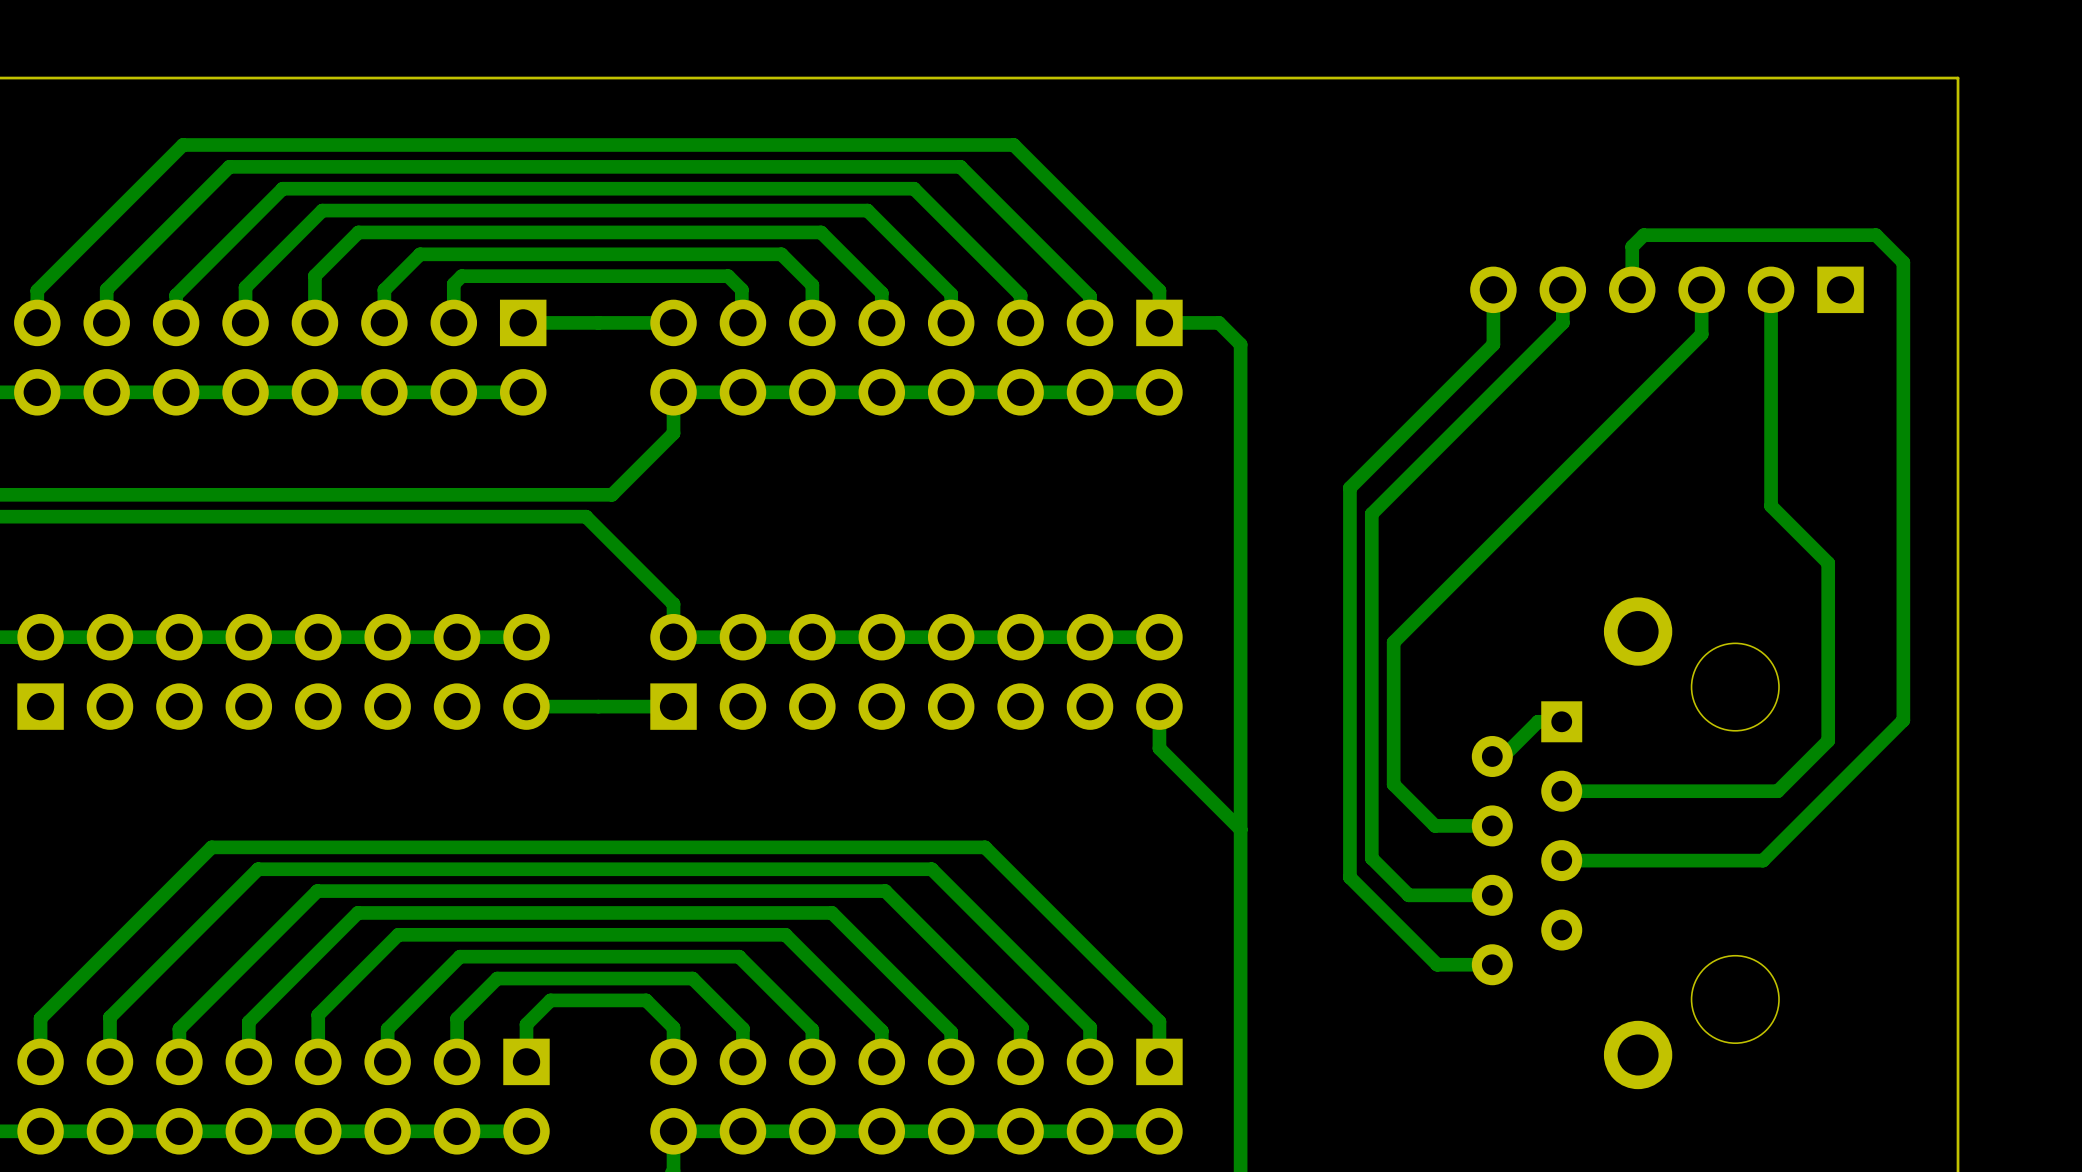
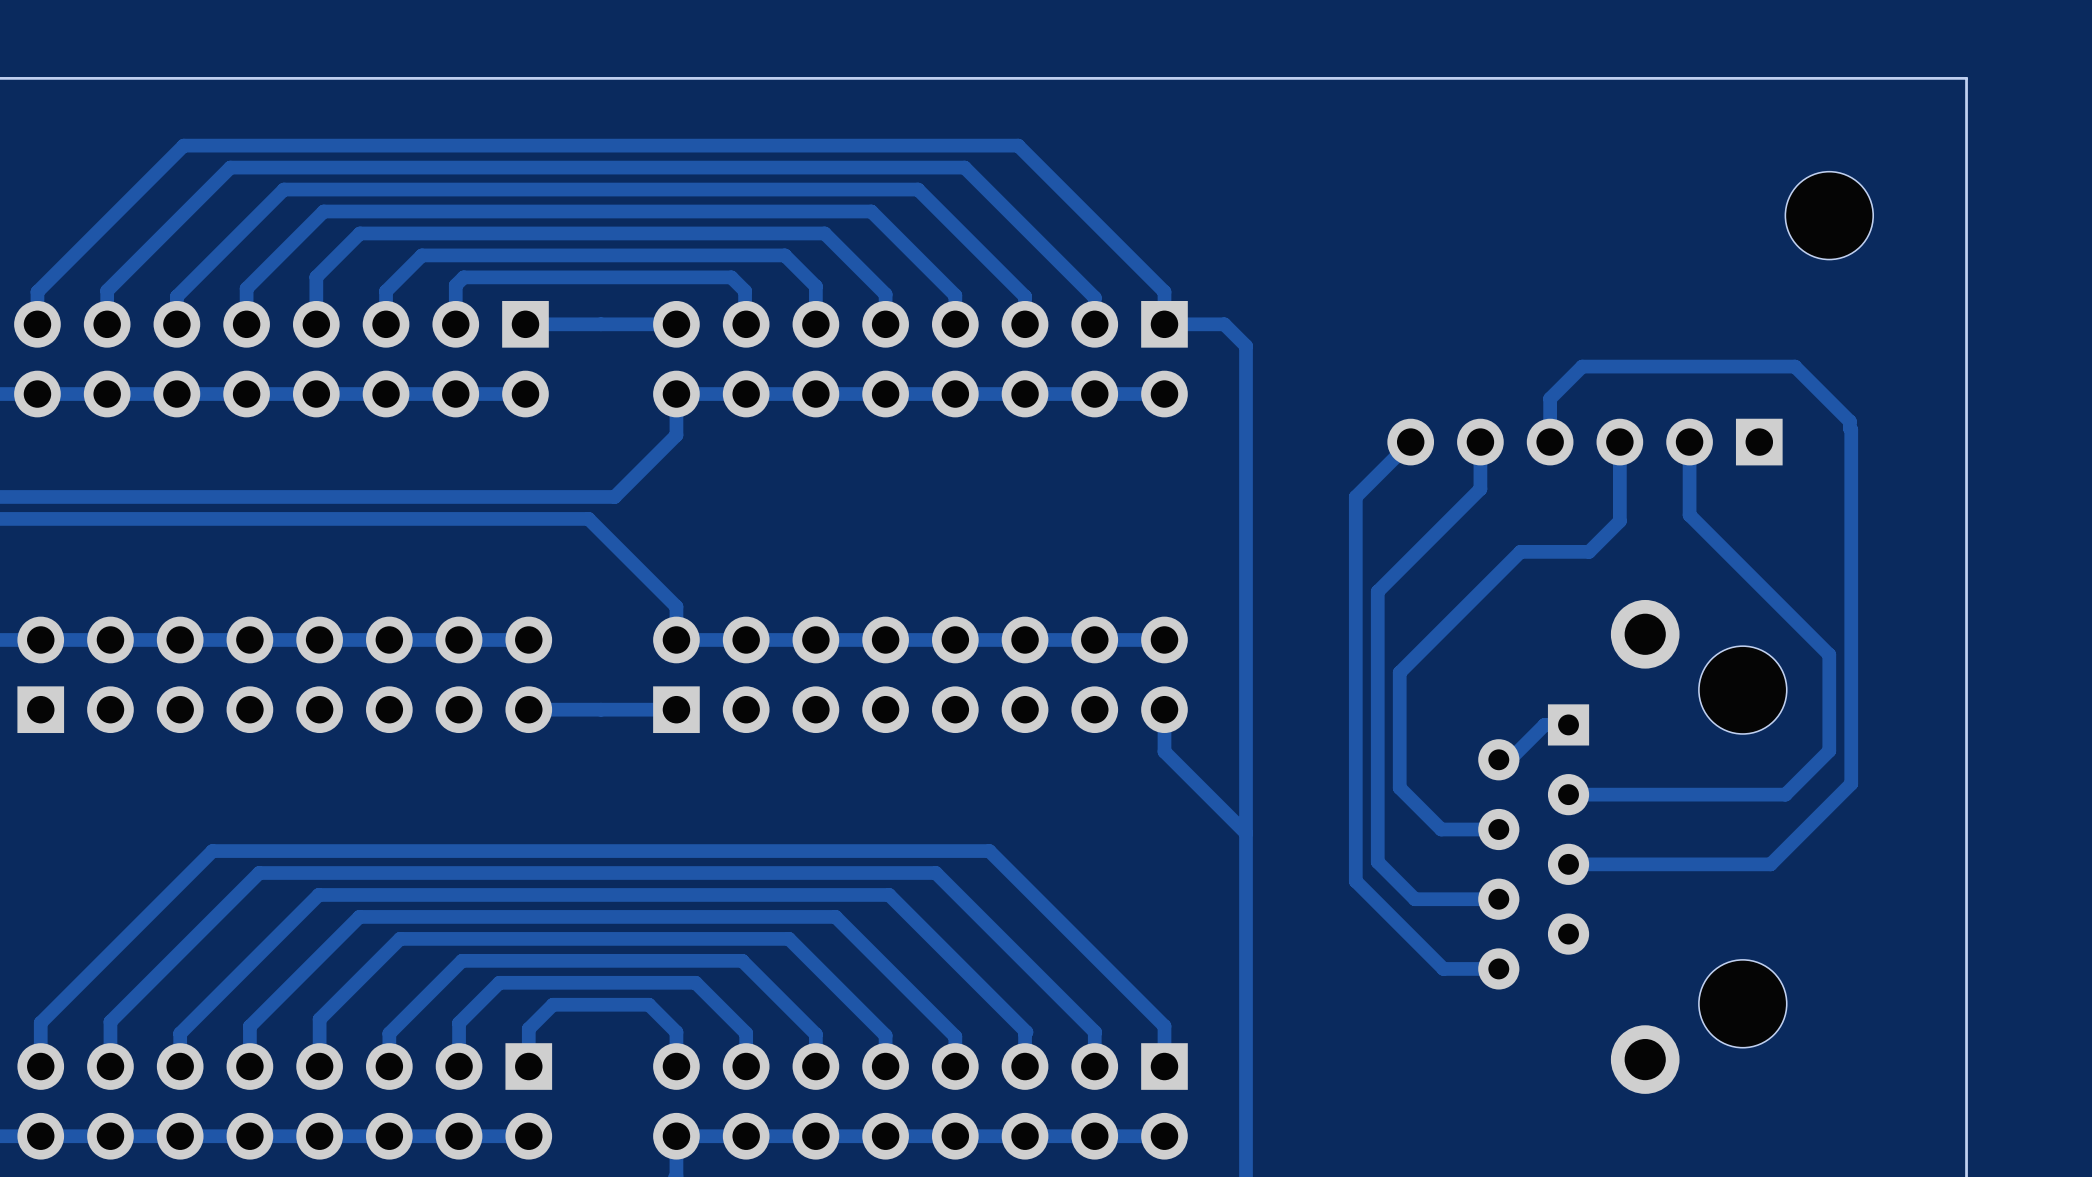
part: none -> (1829, 215)
track: (1493, 289) (1493, 344) (1349, 487) (1349, 494) -> (1410, 442) (1355, 496)
track: (1562, 289) (1562, 322) (1371, 513) (1371, 589) -> (1480, 442) (1480, 489) (1377, 591)
track: (1632, 289) (1632, 246) (1643, 235) (1876, 235) (1903, 262) (1903, 720) (1843, 780) -> (1550, 442) (1550, 398) (1582, 366) (1794, 366) (1849, 421) (1851, 783)
part position: (1666, 289) -> (1584, 442)
track: (1701, 289) (1701, 334) (1393, 642) (1393, 669) -> (1619, 442) (1619, 521) (1589, 551) (1520, 551) (1399, 672)
track: (1771, 289) (1771, 506) (1828, 563) (1828, 740) (1821, 747) -> (1689, 442) (1689, 515) (1829, 654) (1829, 750)

